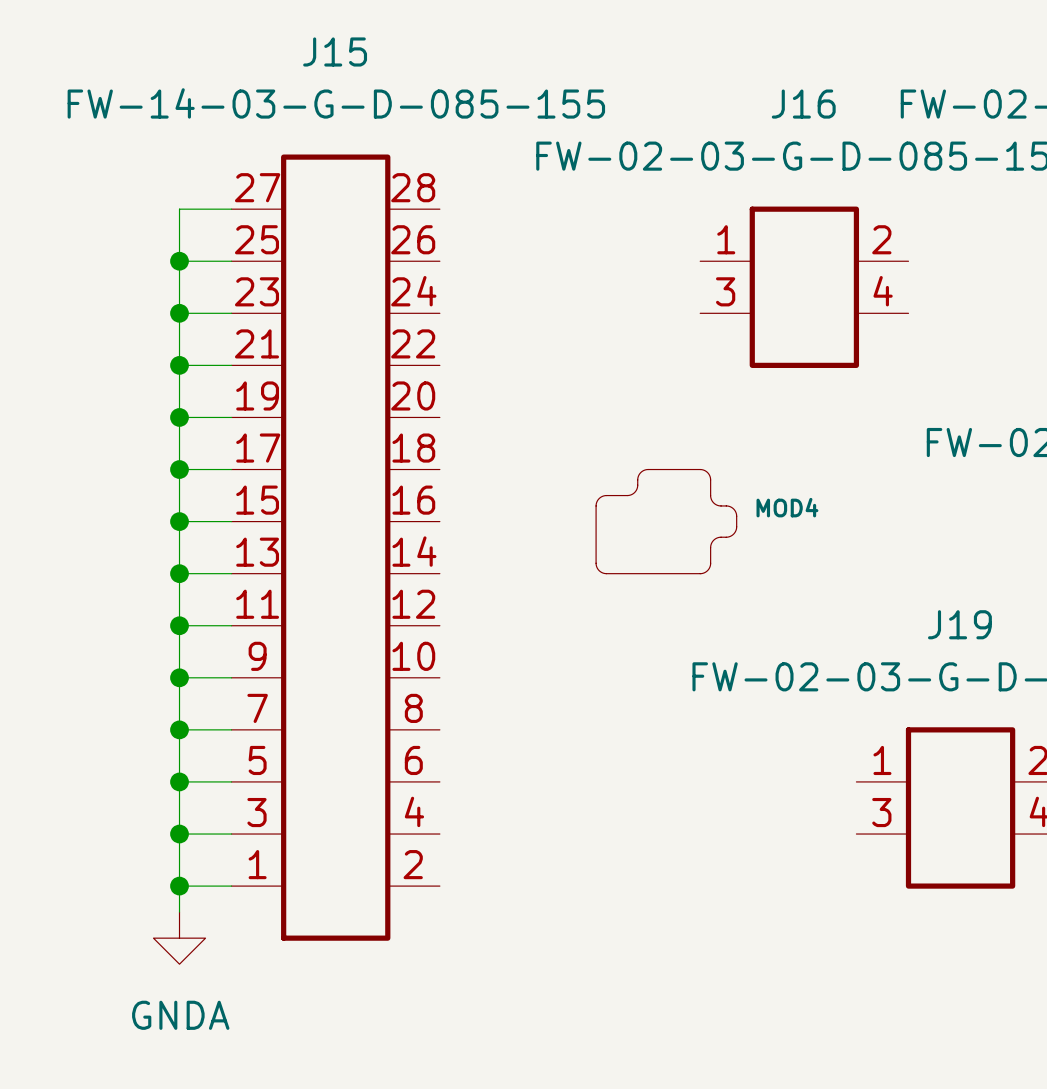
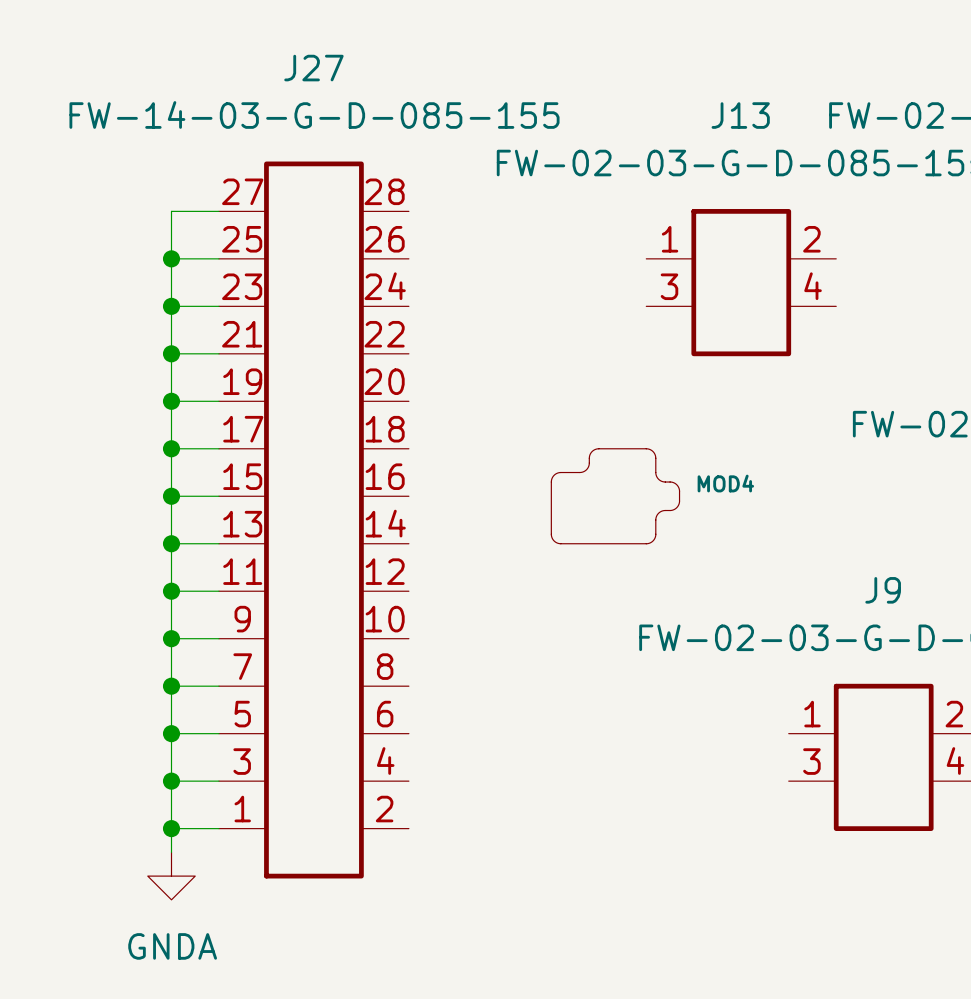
J15 name: J15 (335, 51) -> J27 (313, 68)
J16 name: J16 (803, 104) -> J13 (740, 115)
J19 name: J19 (959, 624) -> J9 (883, 590)

